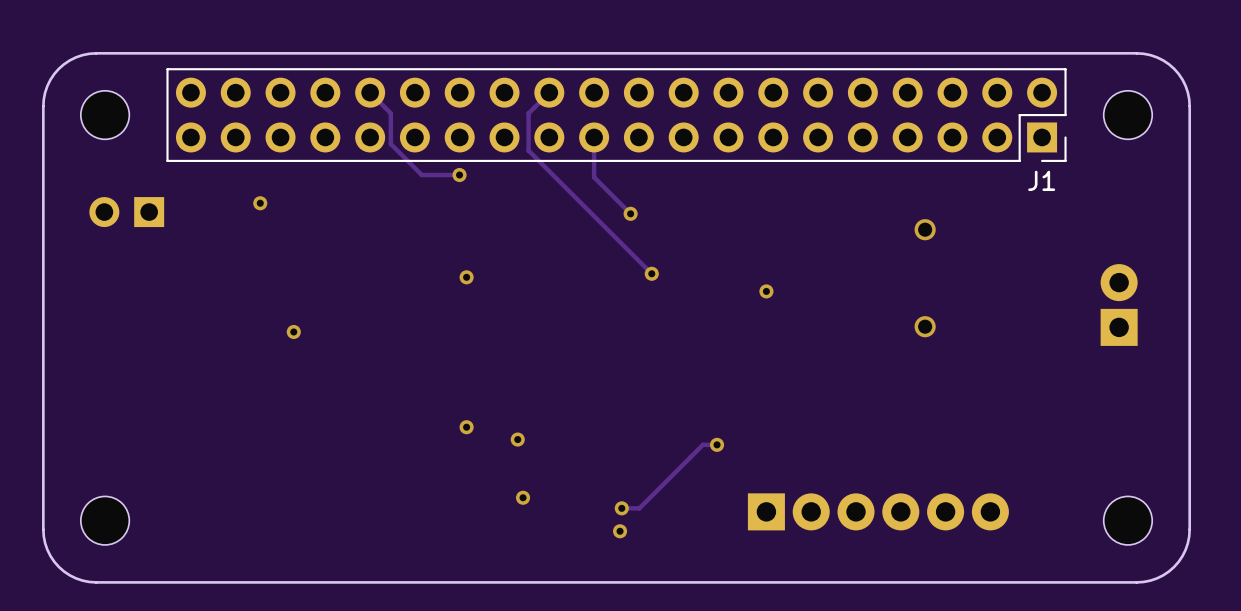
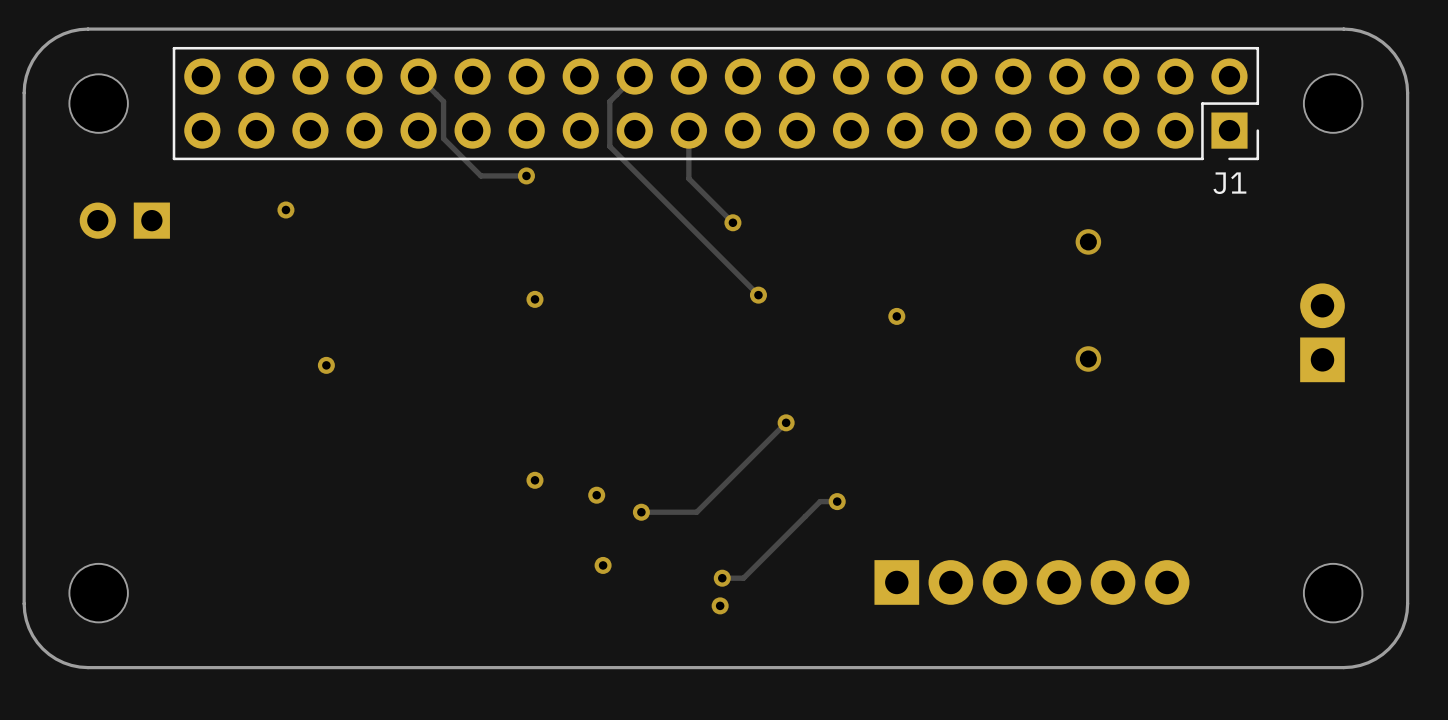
track: none -> (786, 422) (696, 512) (641, 512)
via: none -> (786, 422)
via: none -> (641, 512)

